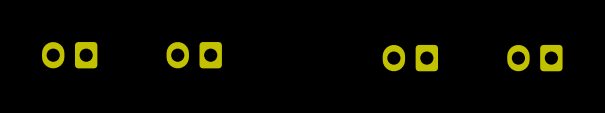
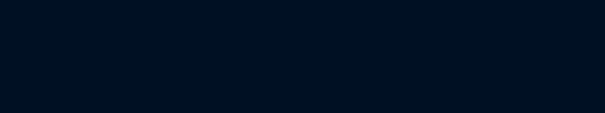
part: (69, 55) -> none
part: (194, 55) -> none
part: (410, 58) -> none
part: (534, 58) -> none

